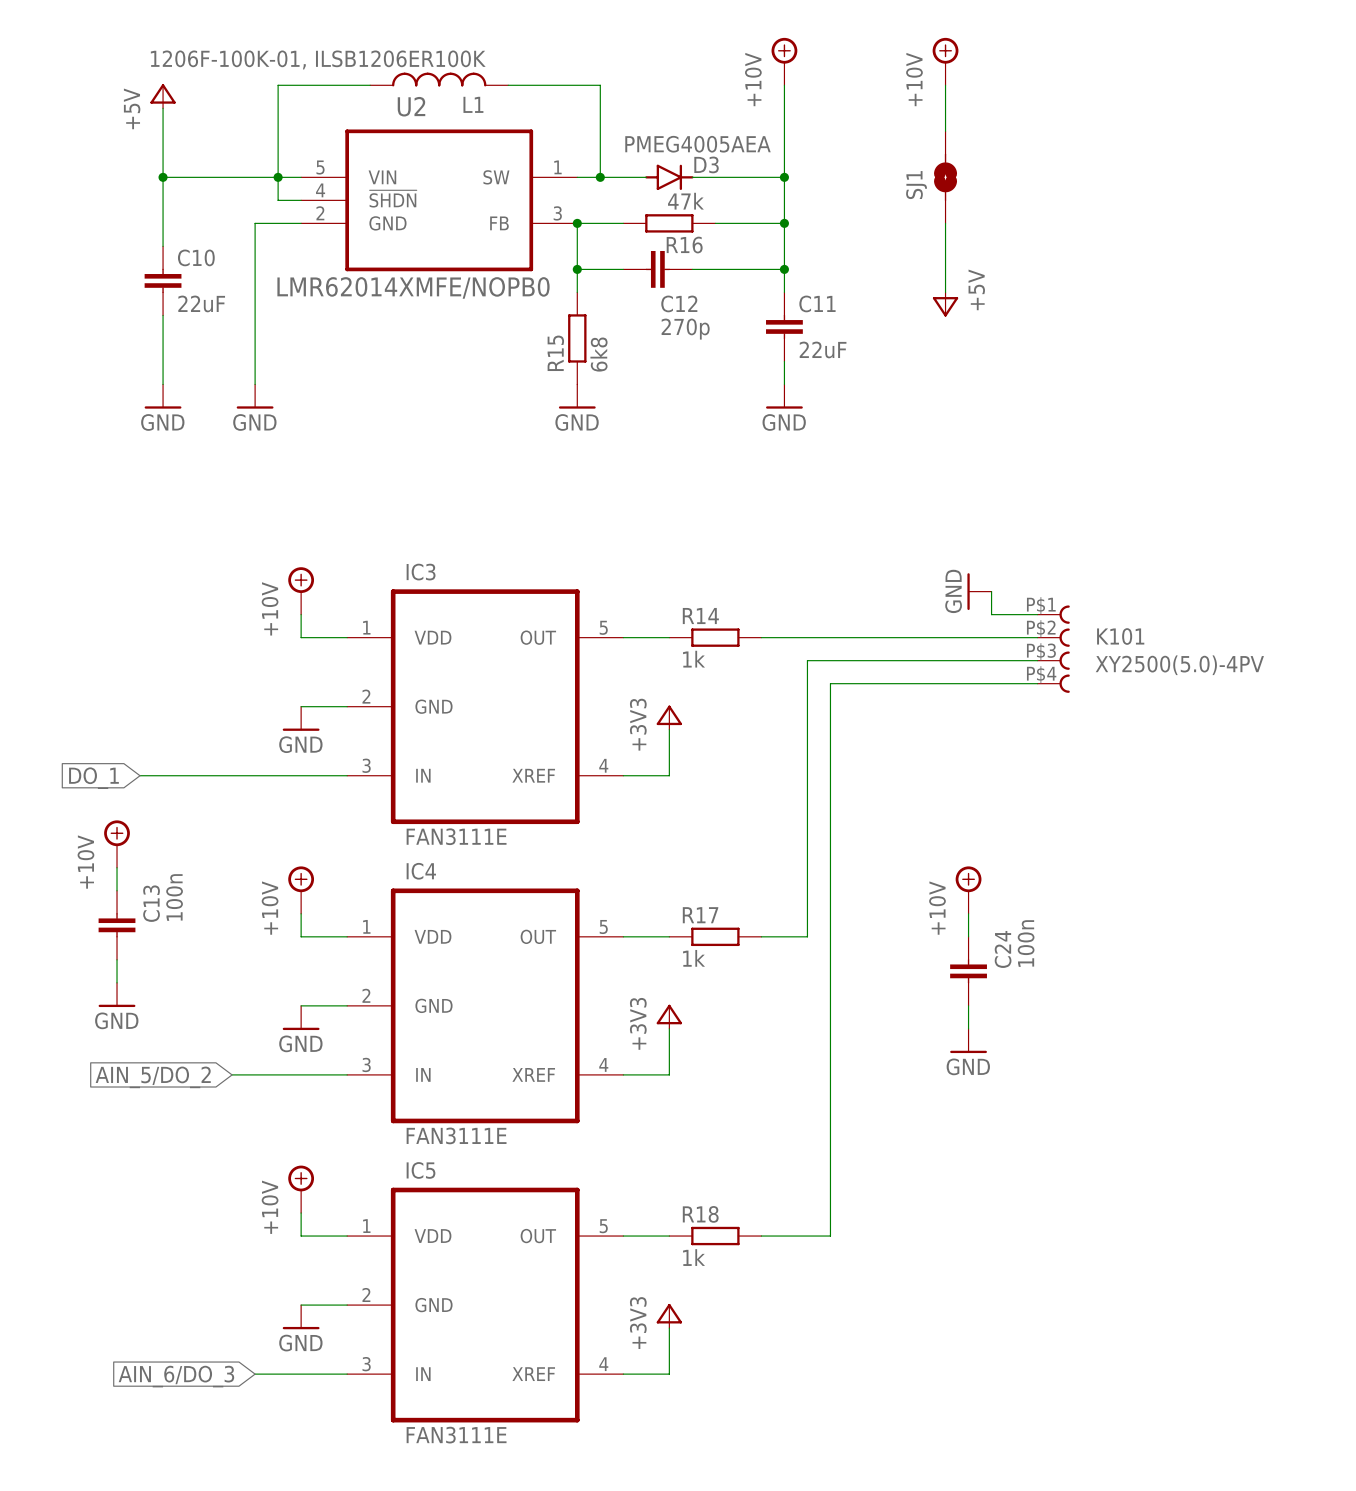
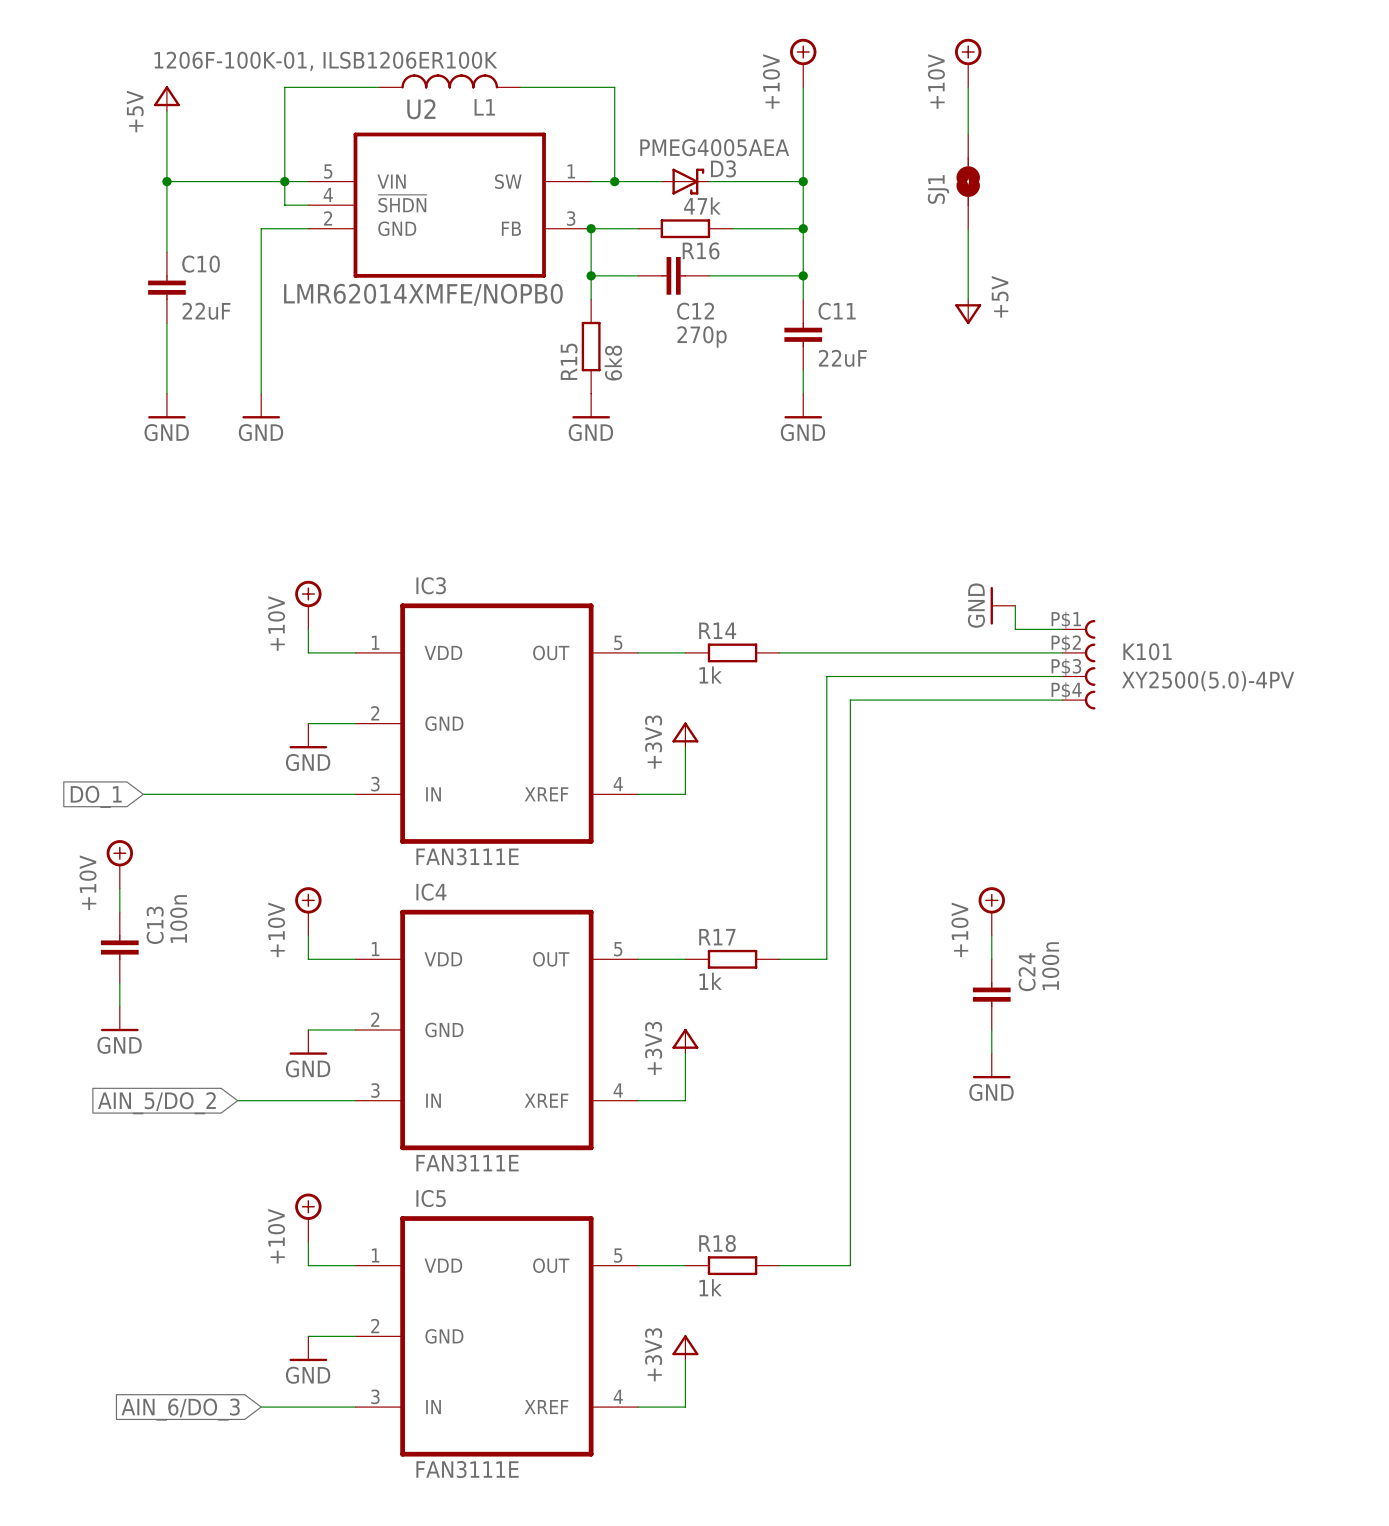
D3 symbol: [645, 164, 694, 191] -> [661, 168, 709, 195]

